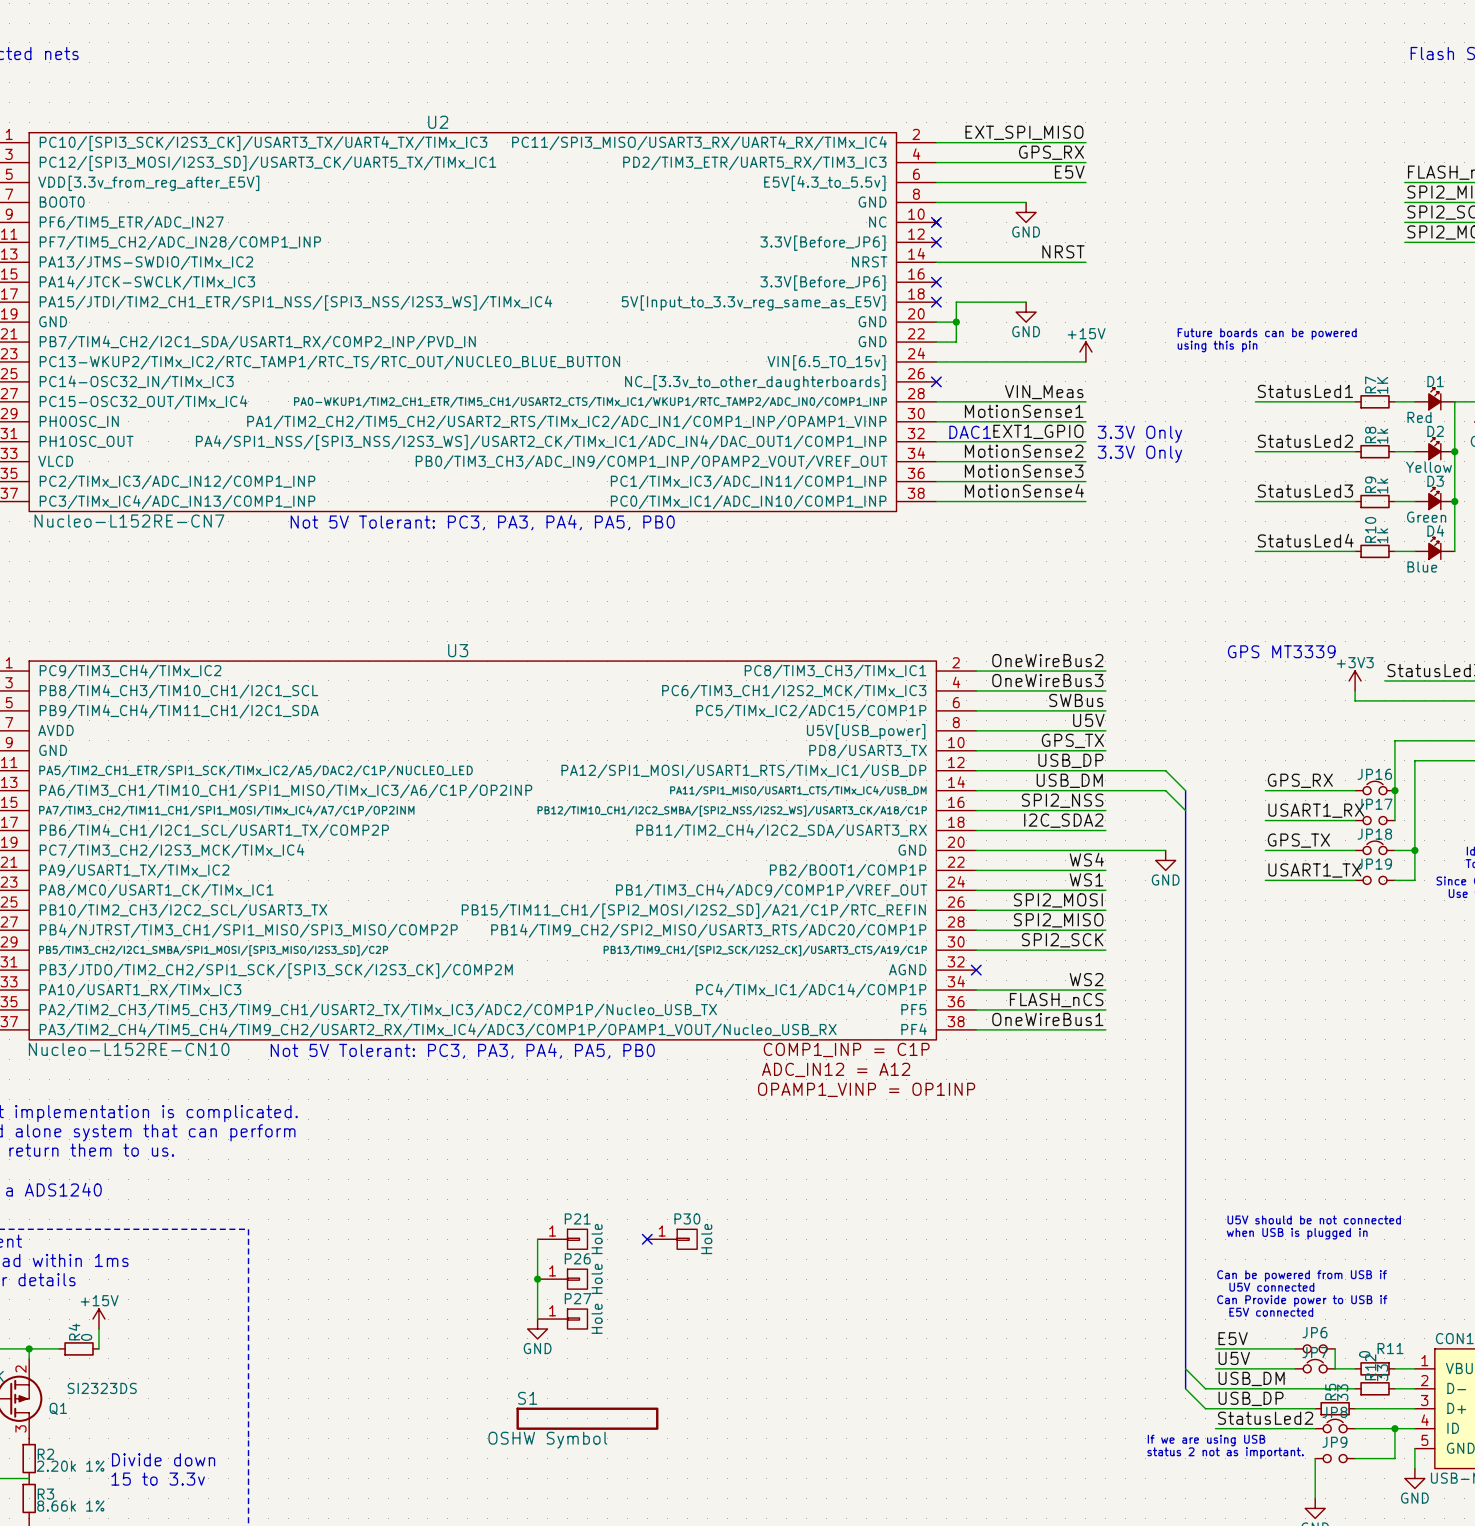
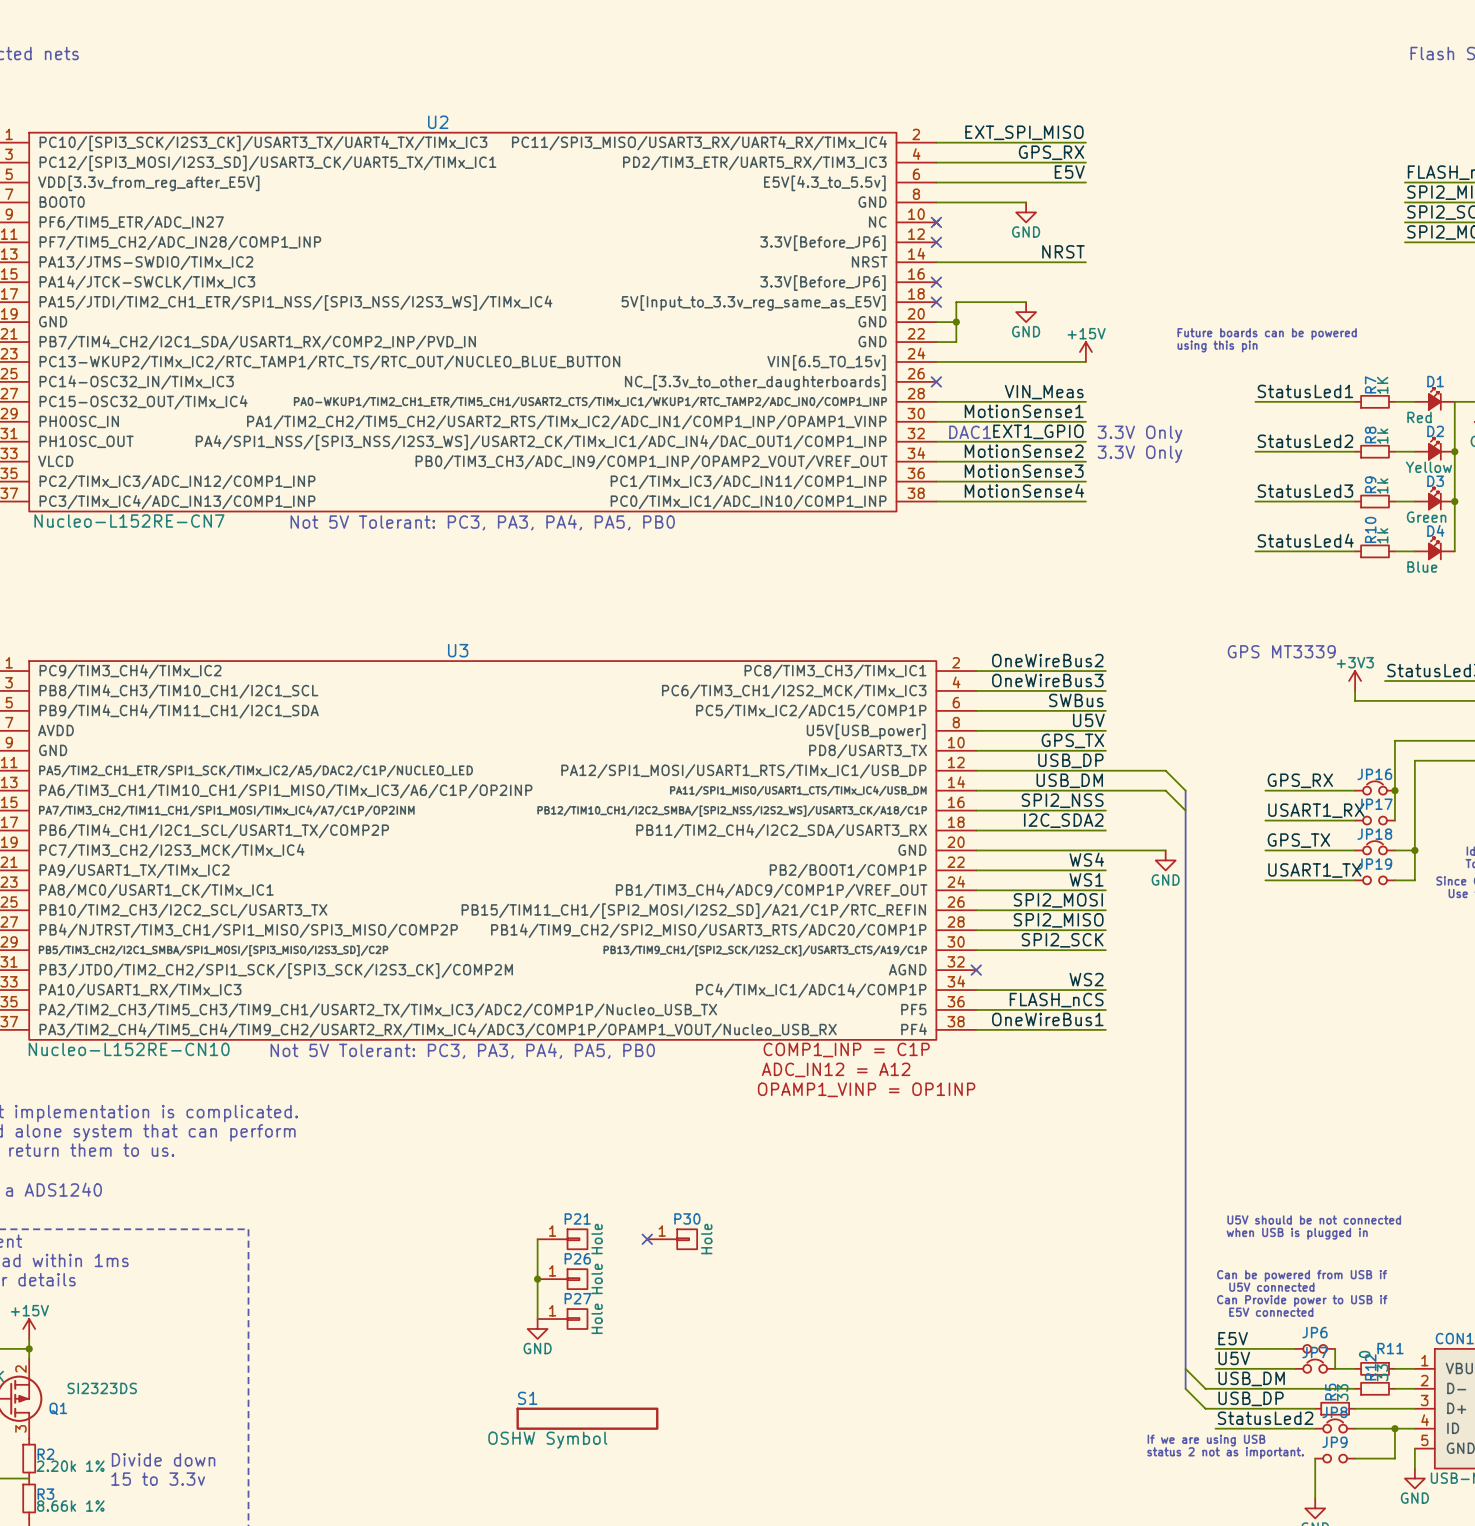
power symbol position: +15V (98, 1319) -> +15V (29, 1328)
wire: (98, 1328) (98, 1348) -> none
wire: (29, 1348) (59, 1348) -> (29, 1348) (29, 1338)
R4: 0 (79, 1348) -> none

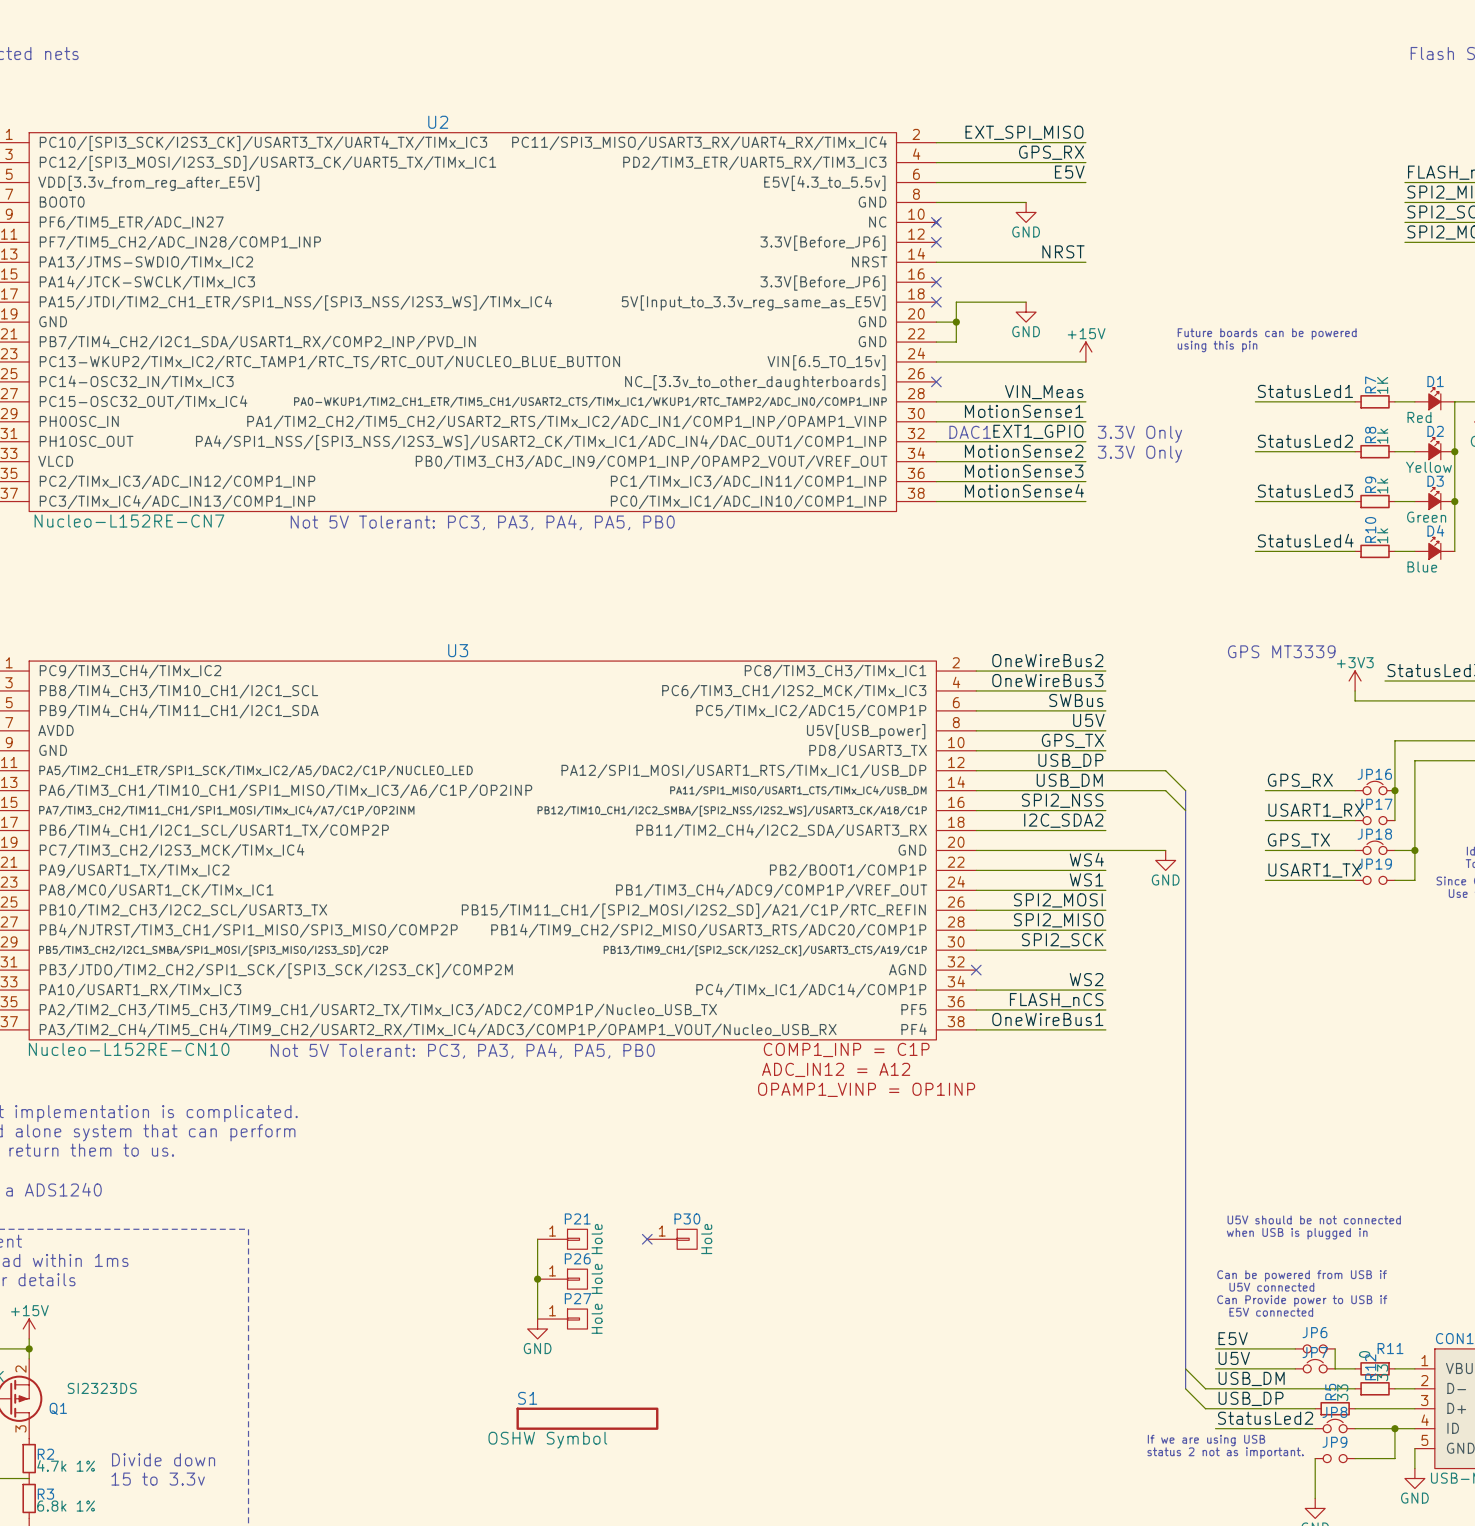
R2 value: 2.20k 1% (70, 1466) -> 4.7k 1% (66, 1465)
R3 value: 8.66k 1% (70, 1506) -> 6.8k 1% (66, 1506)

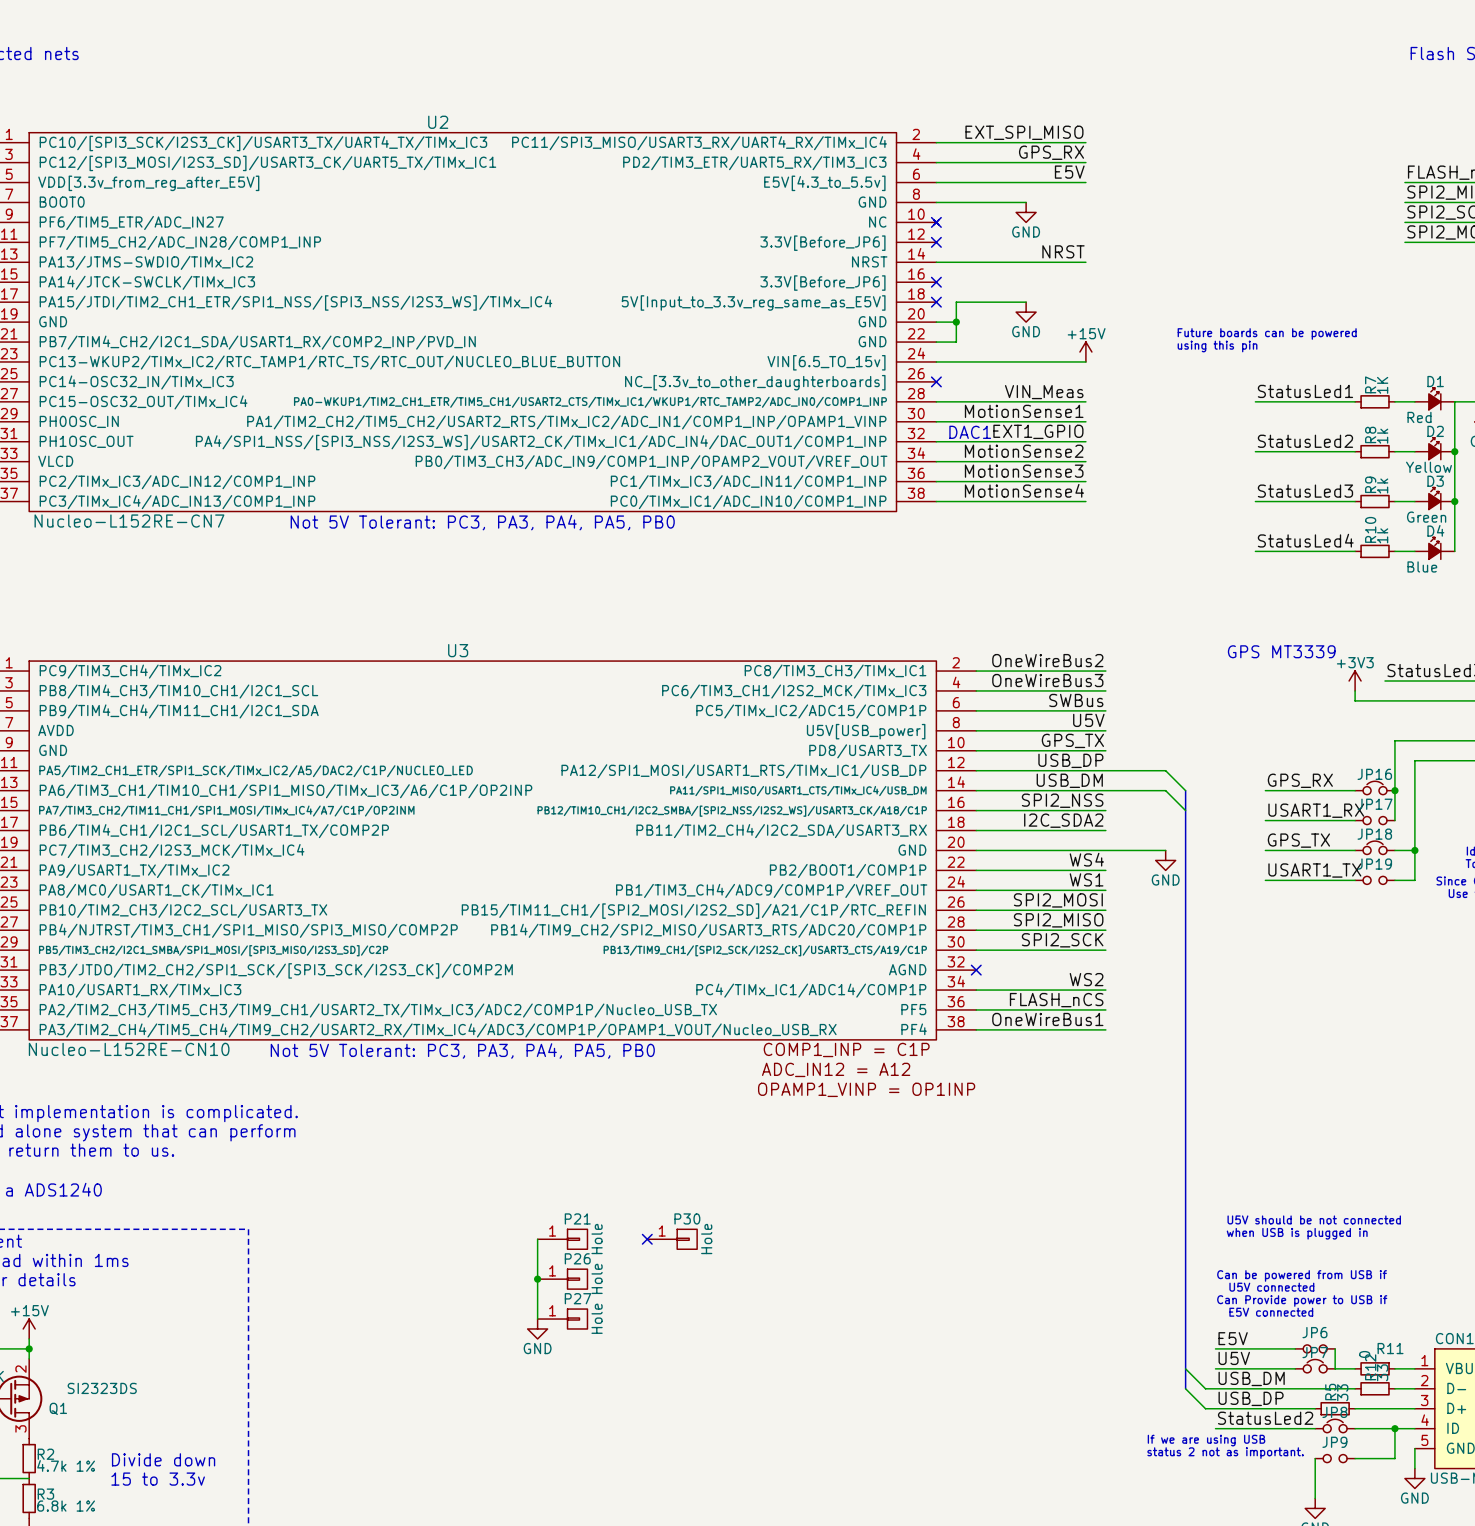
text: 3.3V Only (1139, 434) -> none
text: 3.3V Only (1139, 454) -> none
S1: OSHW Symbol (587, 1418) -> none

